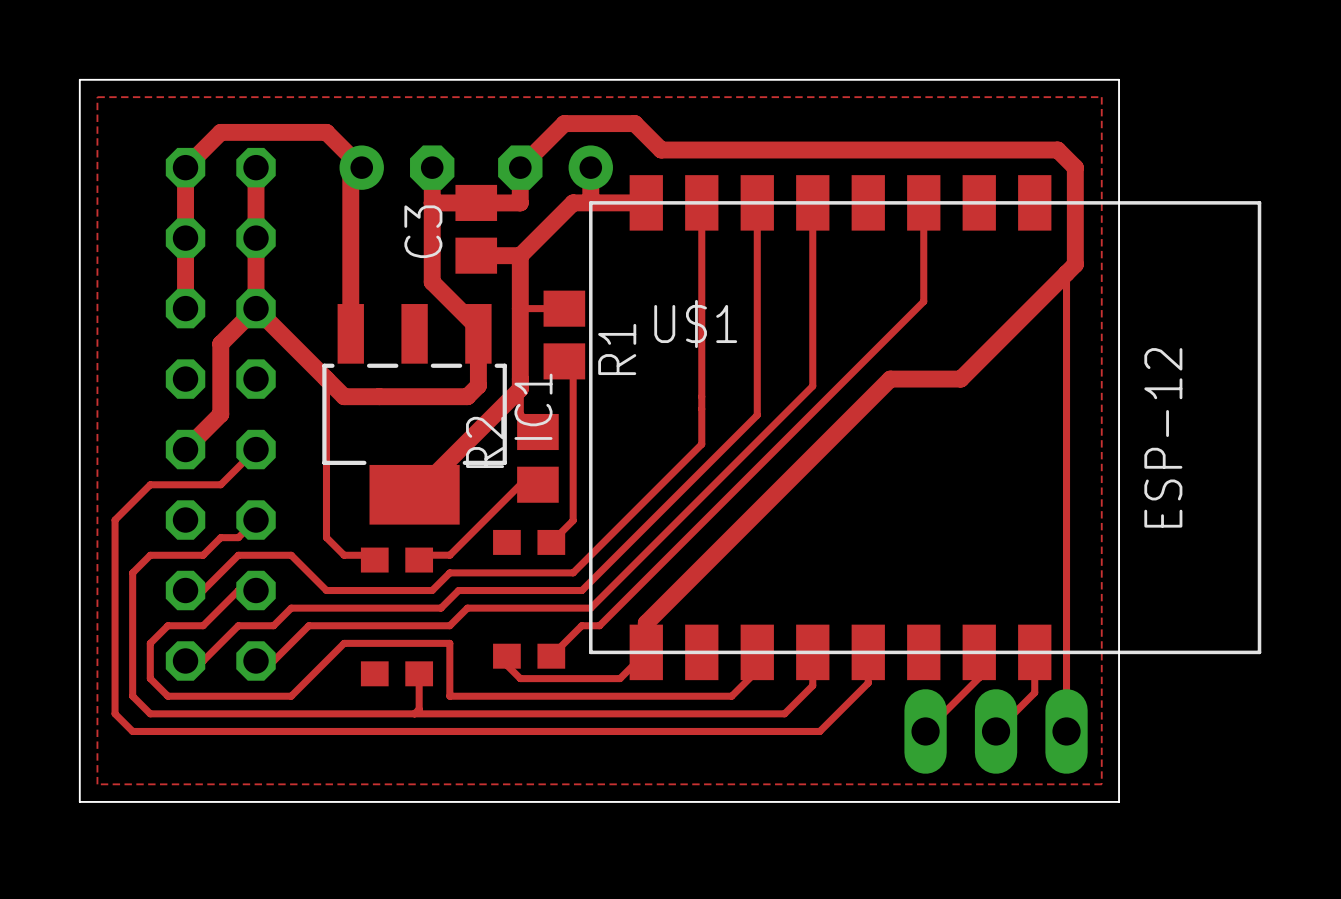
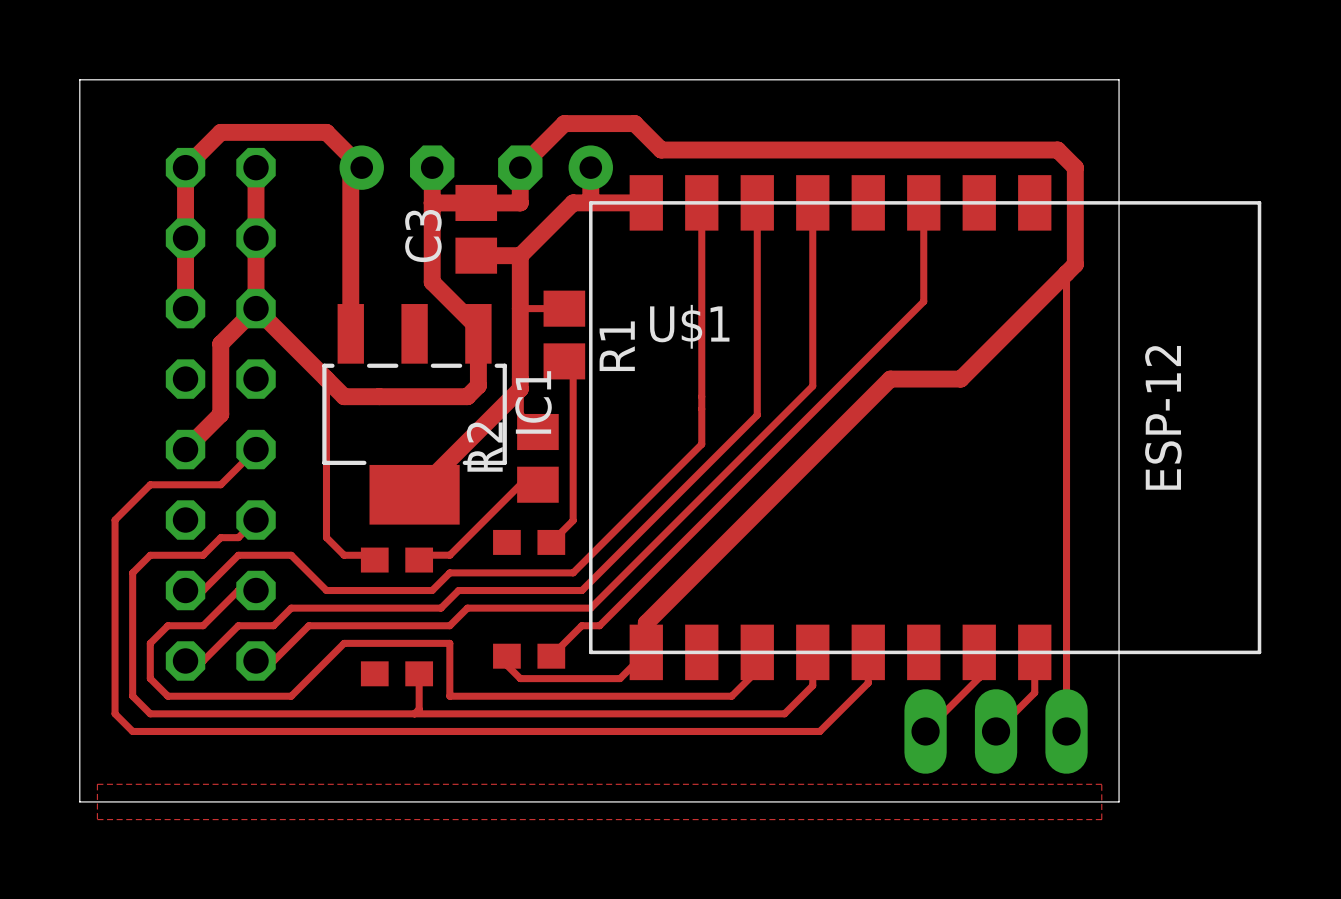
zone outline: (97, 784) (97, 97) (1101, 97) (1101, 784) -> (97, 784) (97, 819) (1101, 819) (1101, 784)

